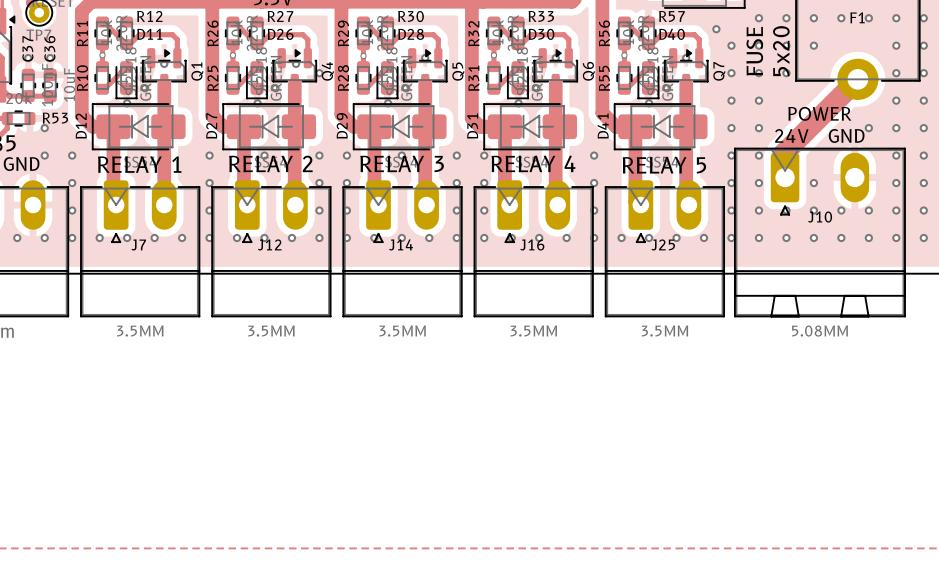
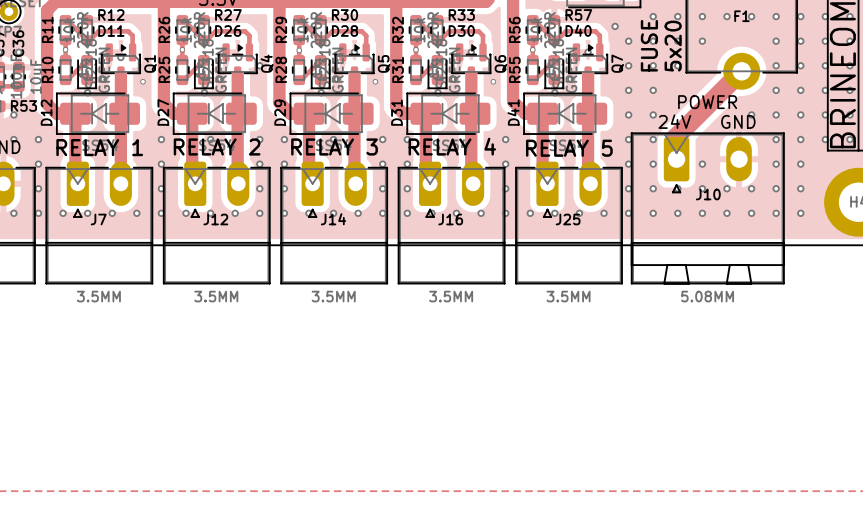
via: none -> (142, 81)
via: none -> (375, 81)
via: none -> (493, 81)

